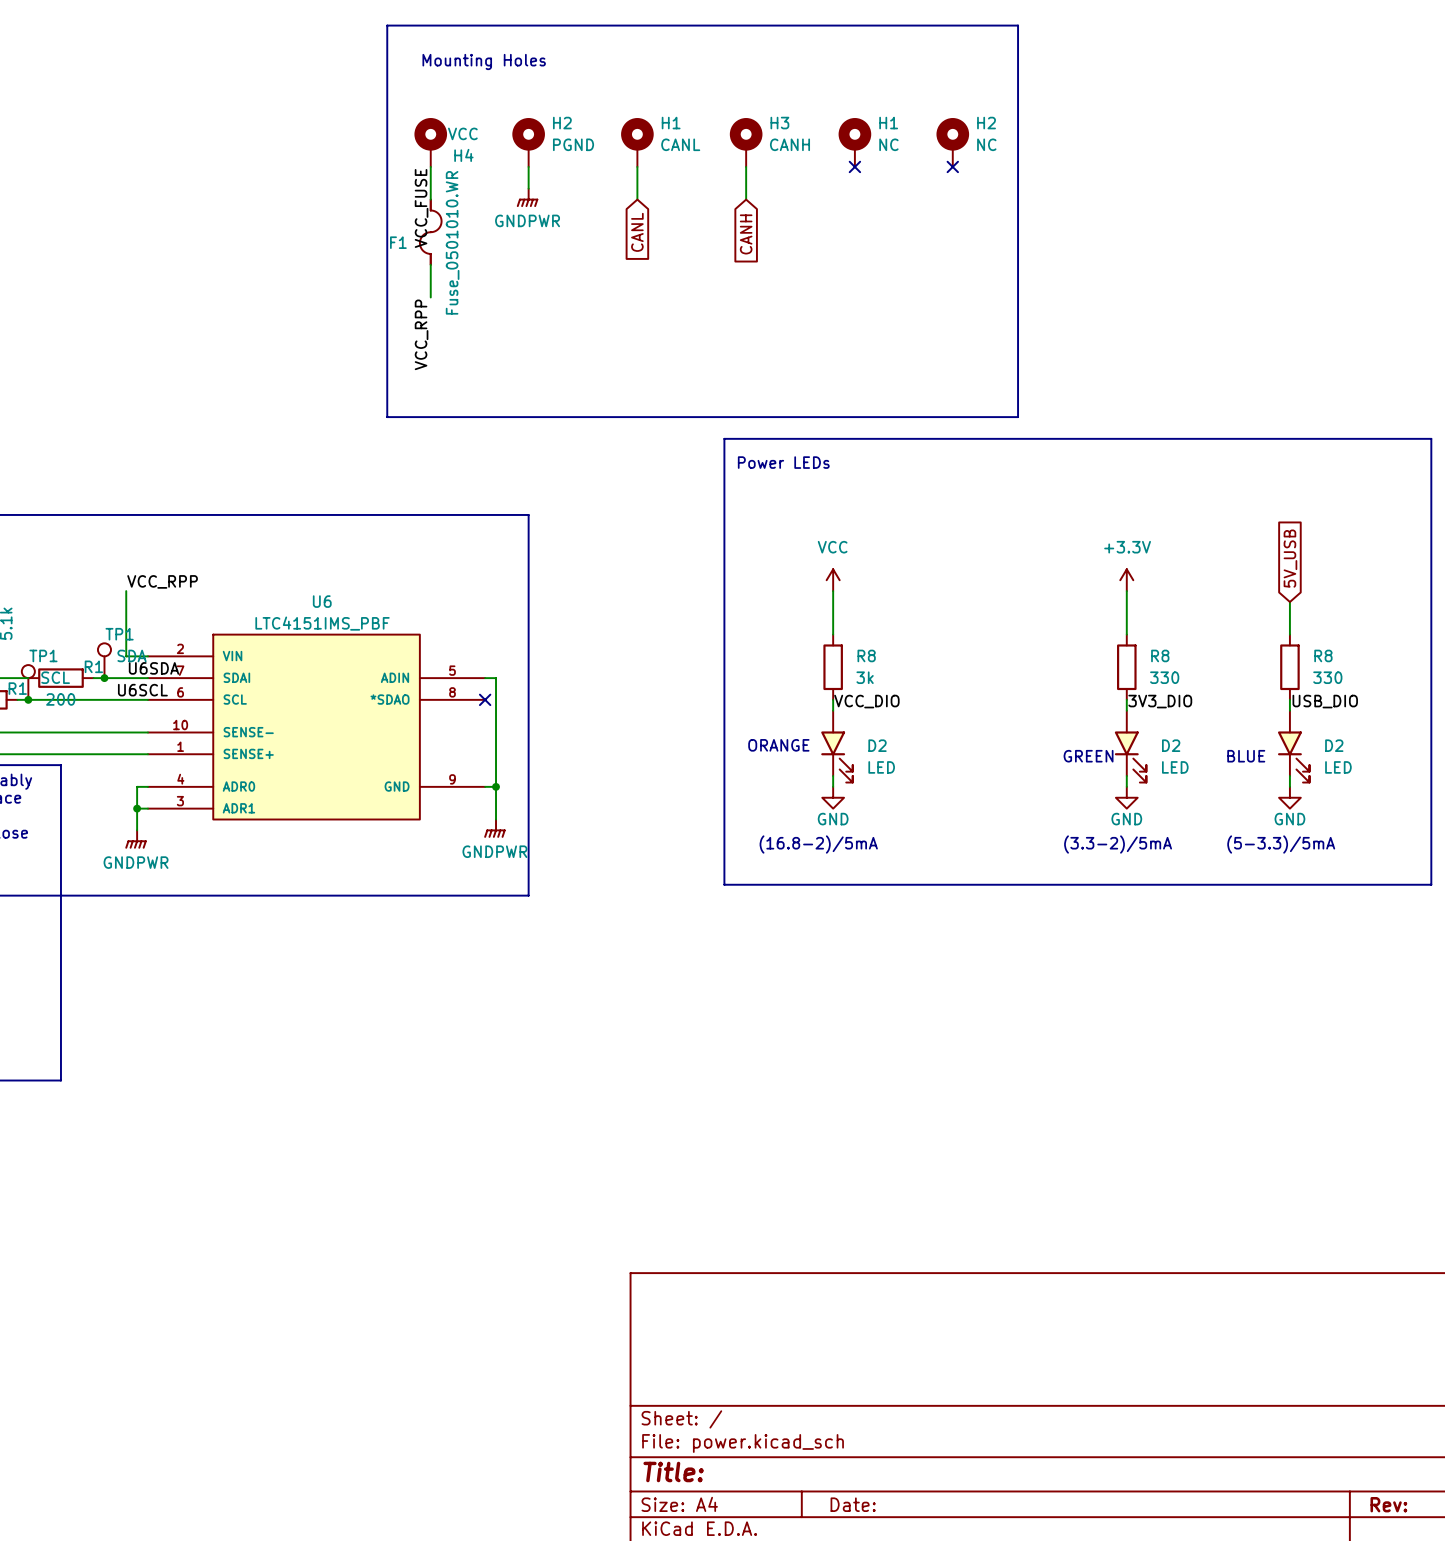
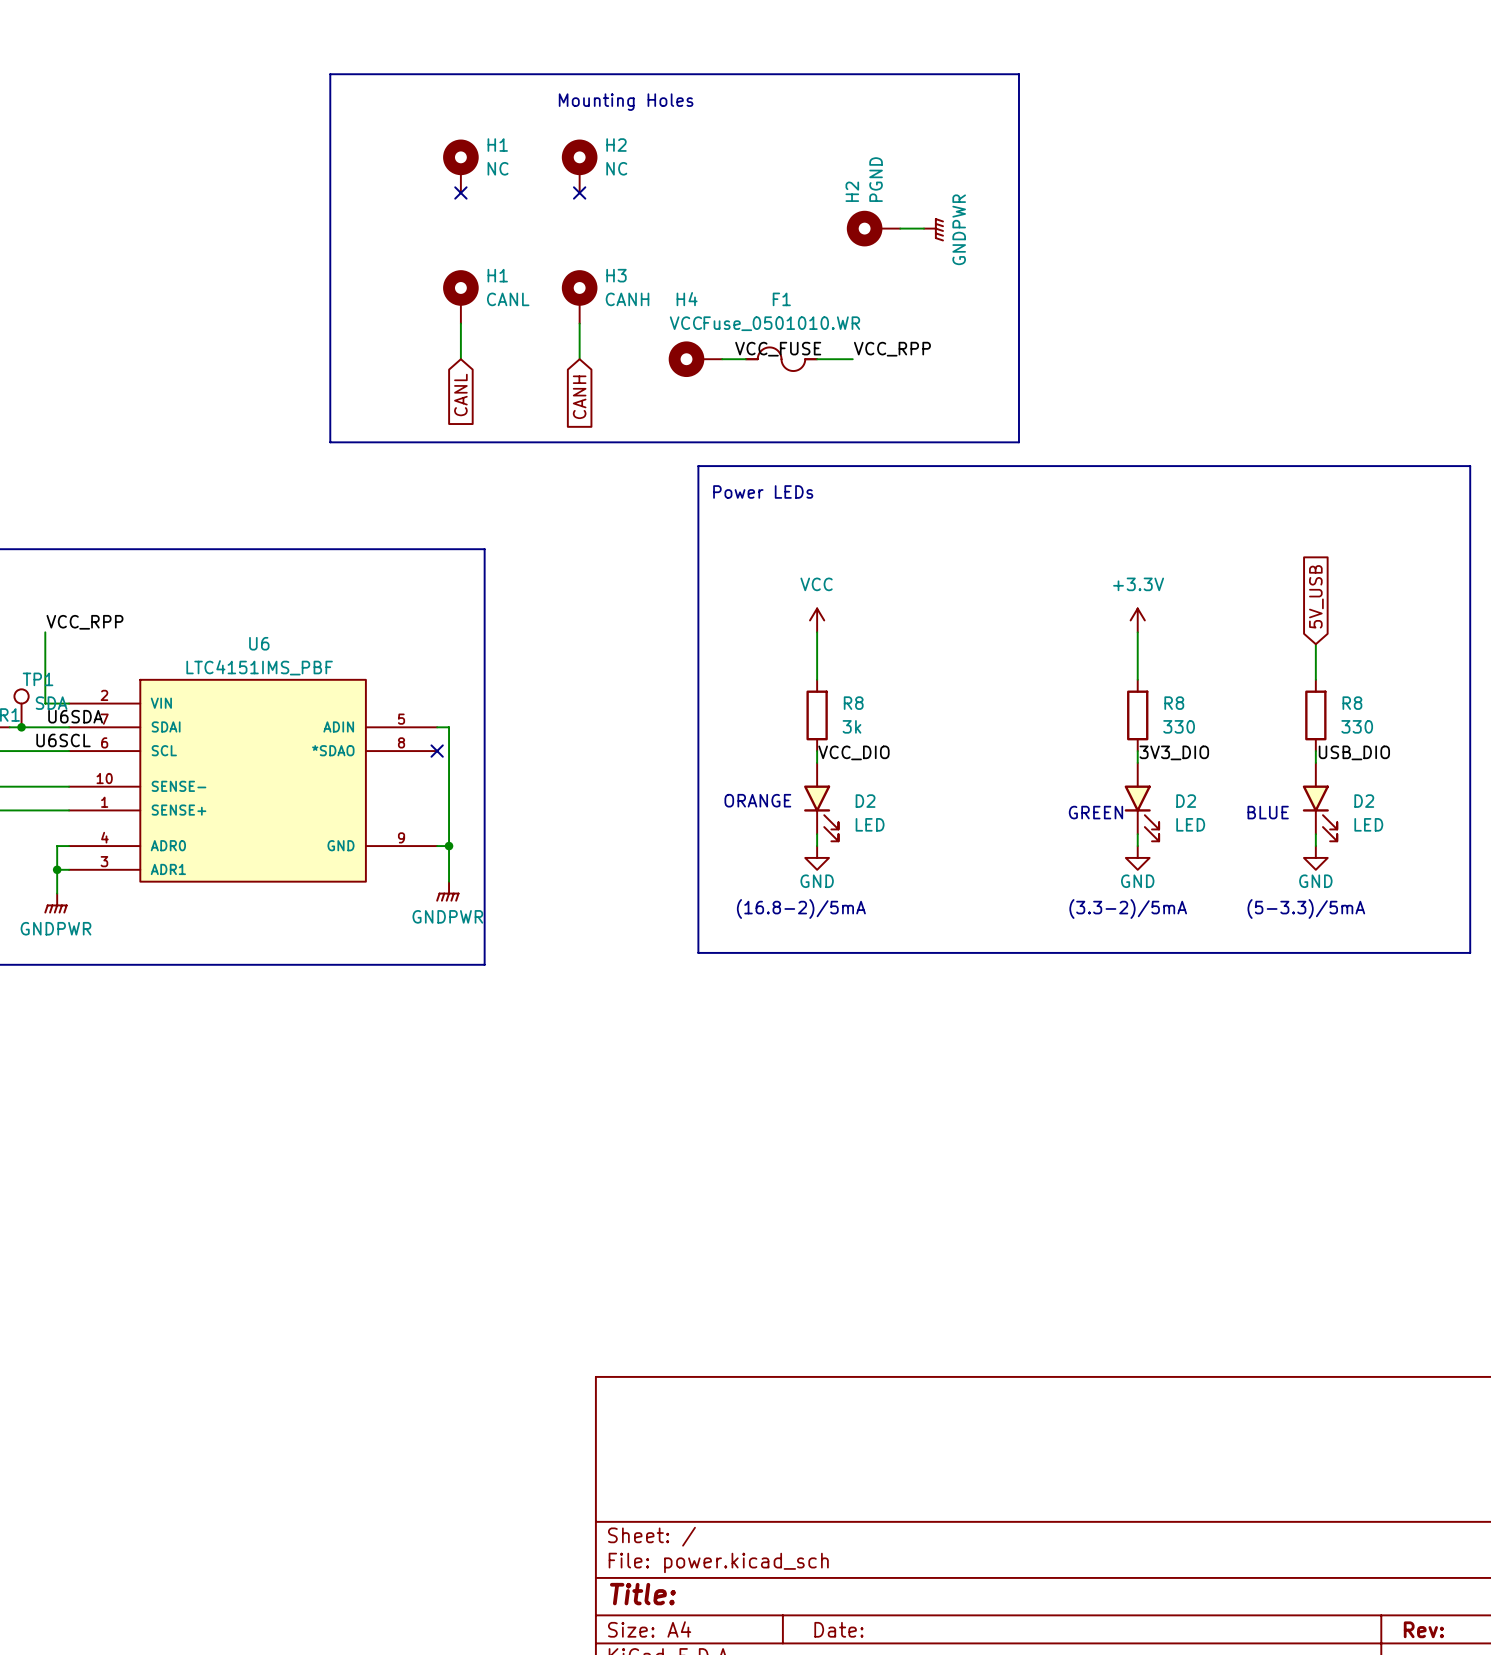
text position: Mounting Holes (484, 61) -> Mounting Holes (626, 102)
line: (387, 79) (387, 25) (1018, 25) (1018, 79) -> (330, 74) (1018, 74)
H4 rotation: 0° (430, 134) -> 90° counterclockwise (686, 359)
H4 position: (430, 142) -> (695, 359)
H2: PGND (528, 142) -> none
H1 position: (637, 142) -> (460, 296)
H3 position: (746, 142) -> (579, 296)
H1: NC (854, 142) -> none
H2: NC (952, 142) -> none
H4 name position: H4 (463, 155) -> H4 (687, 299)
H1: none -> NC (460, 166)
H2: none -> NC (579, 166)
wire: (430, 166) (430, 199) -> none
wire: (528, 166) (528, 188) -> none
wire: (637, 166) (637, 199) -> (460, 323) (460, 359)
wire: (746, 166) (746, 199) -> (579, 323) (579, 359)
no-connect mark: (854, 166) -> none
no-connect mark: (952, 166) -> none
no-connect mark: none -> (460, 192)
no-connect mark: none -> (579, 192)
power symbol: GNDPWR (527, 197) -> none
label: VCC_FUSE (421, 208) -> none
H2: none -> PGND (873, 228)
wire: none -> (900, 228) (923, 228)
power symbol: none -> GNDPWR (933, 229)
F1 rotation: 0° (430, 232) -> 90° clockwise (781, 359)
F1 position: (430, 232) -> (781, 359)
global label position: CANL (637, 232) -> CANL (460, 394)
global label position: CANH (746, 234) -> CANH (579, 397)
F1 name position: F1 (398, 242) -> F1 (781, 299)
F1 value position: Fuse_0501010.WR (452, 242) -> Fuse_0501010.WR (781, 323)
wire: (430, 264) (430, 297) -> none
label: none -> VCC_FUSE (778, 349)
label: none -> VCC_RPP (892, 349)
label: VCC_RPP (421, 334) -> none
wire: none -> (722, 359) (745, 359)
wire: none -> (817, 359) (852, 359)

